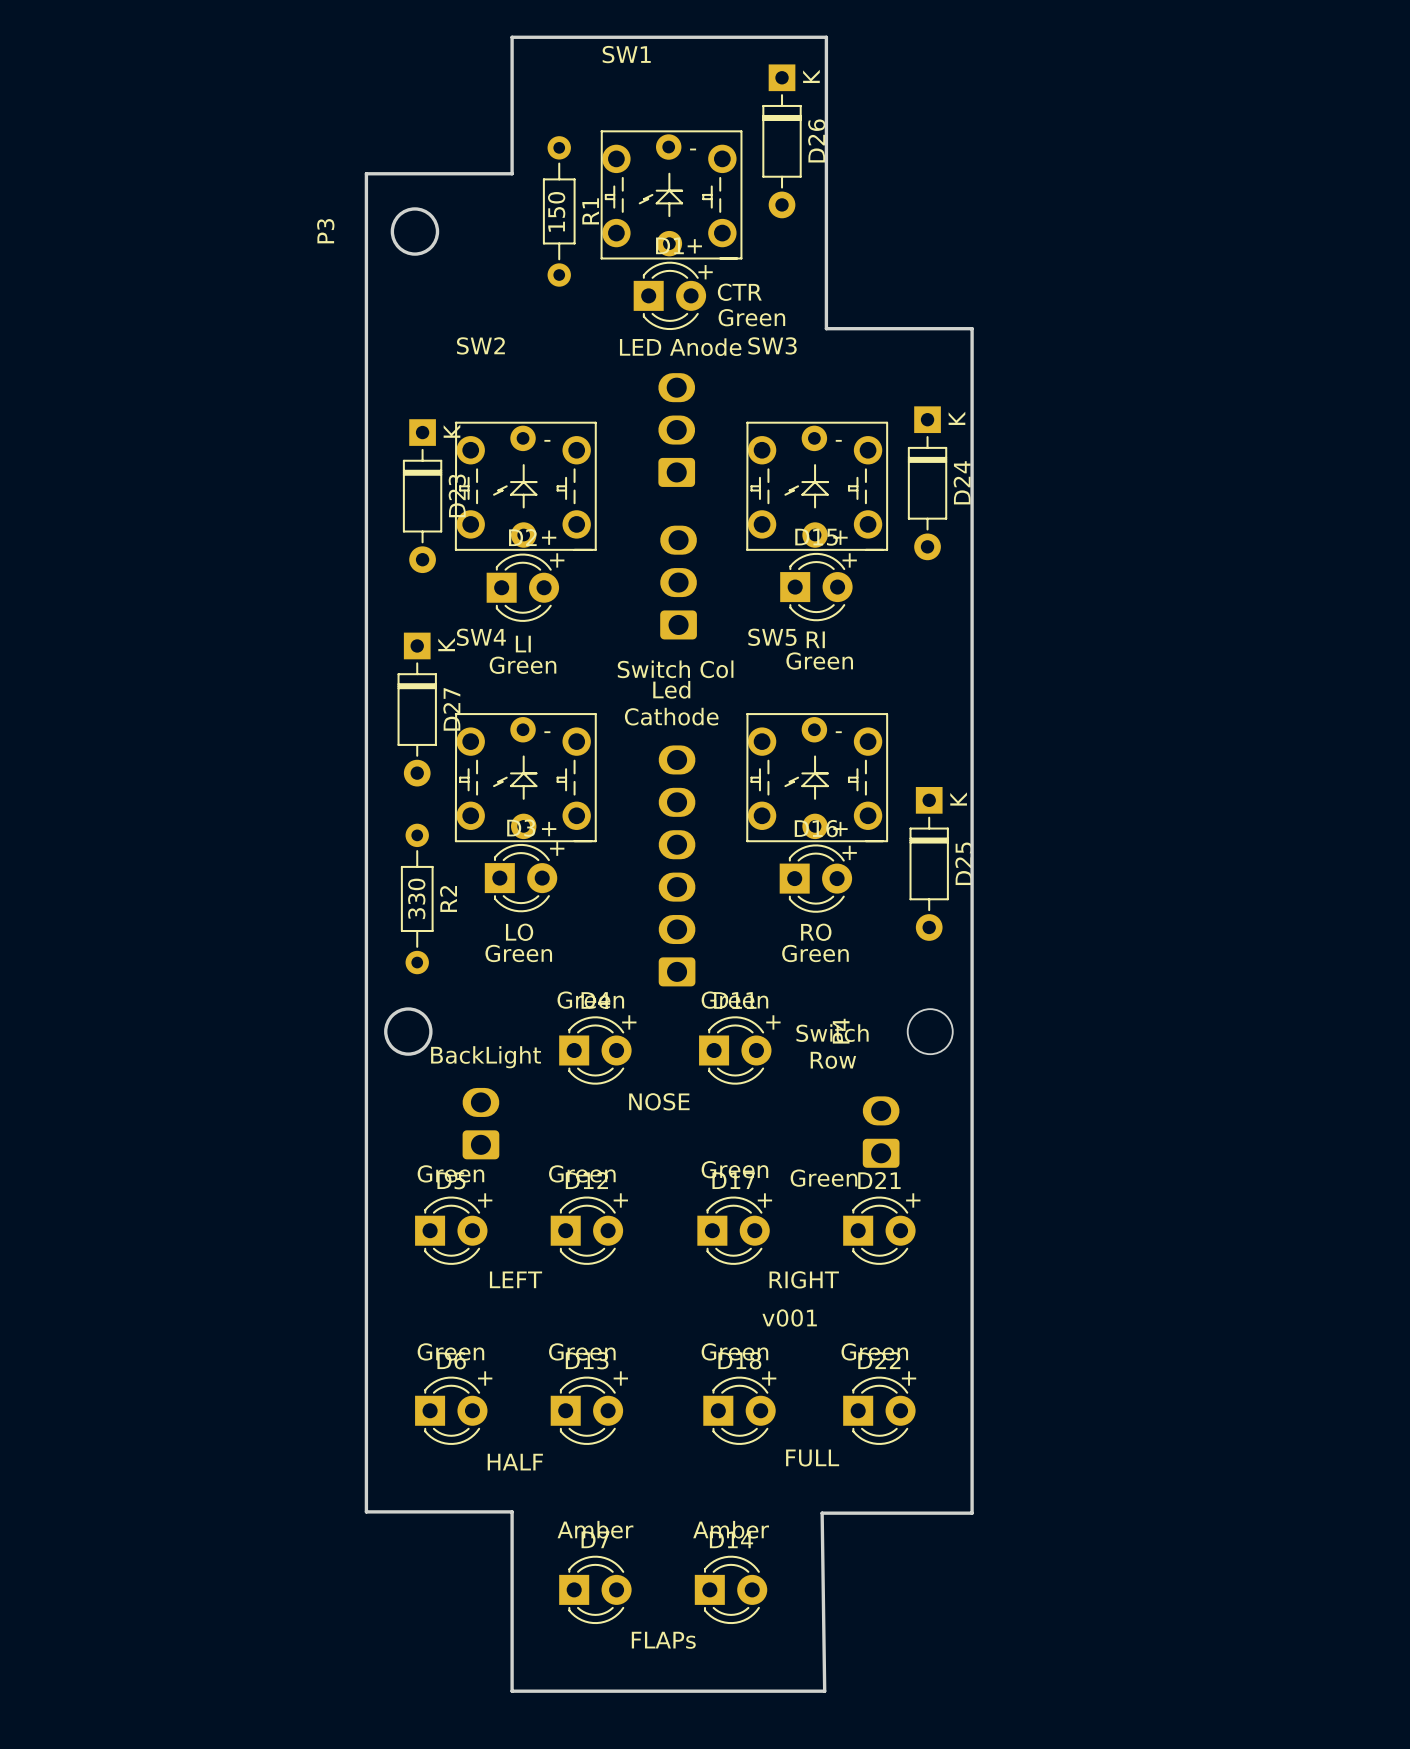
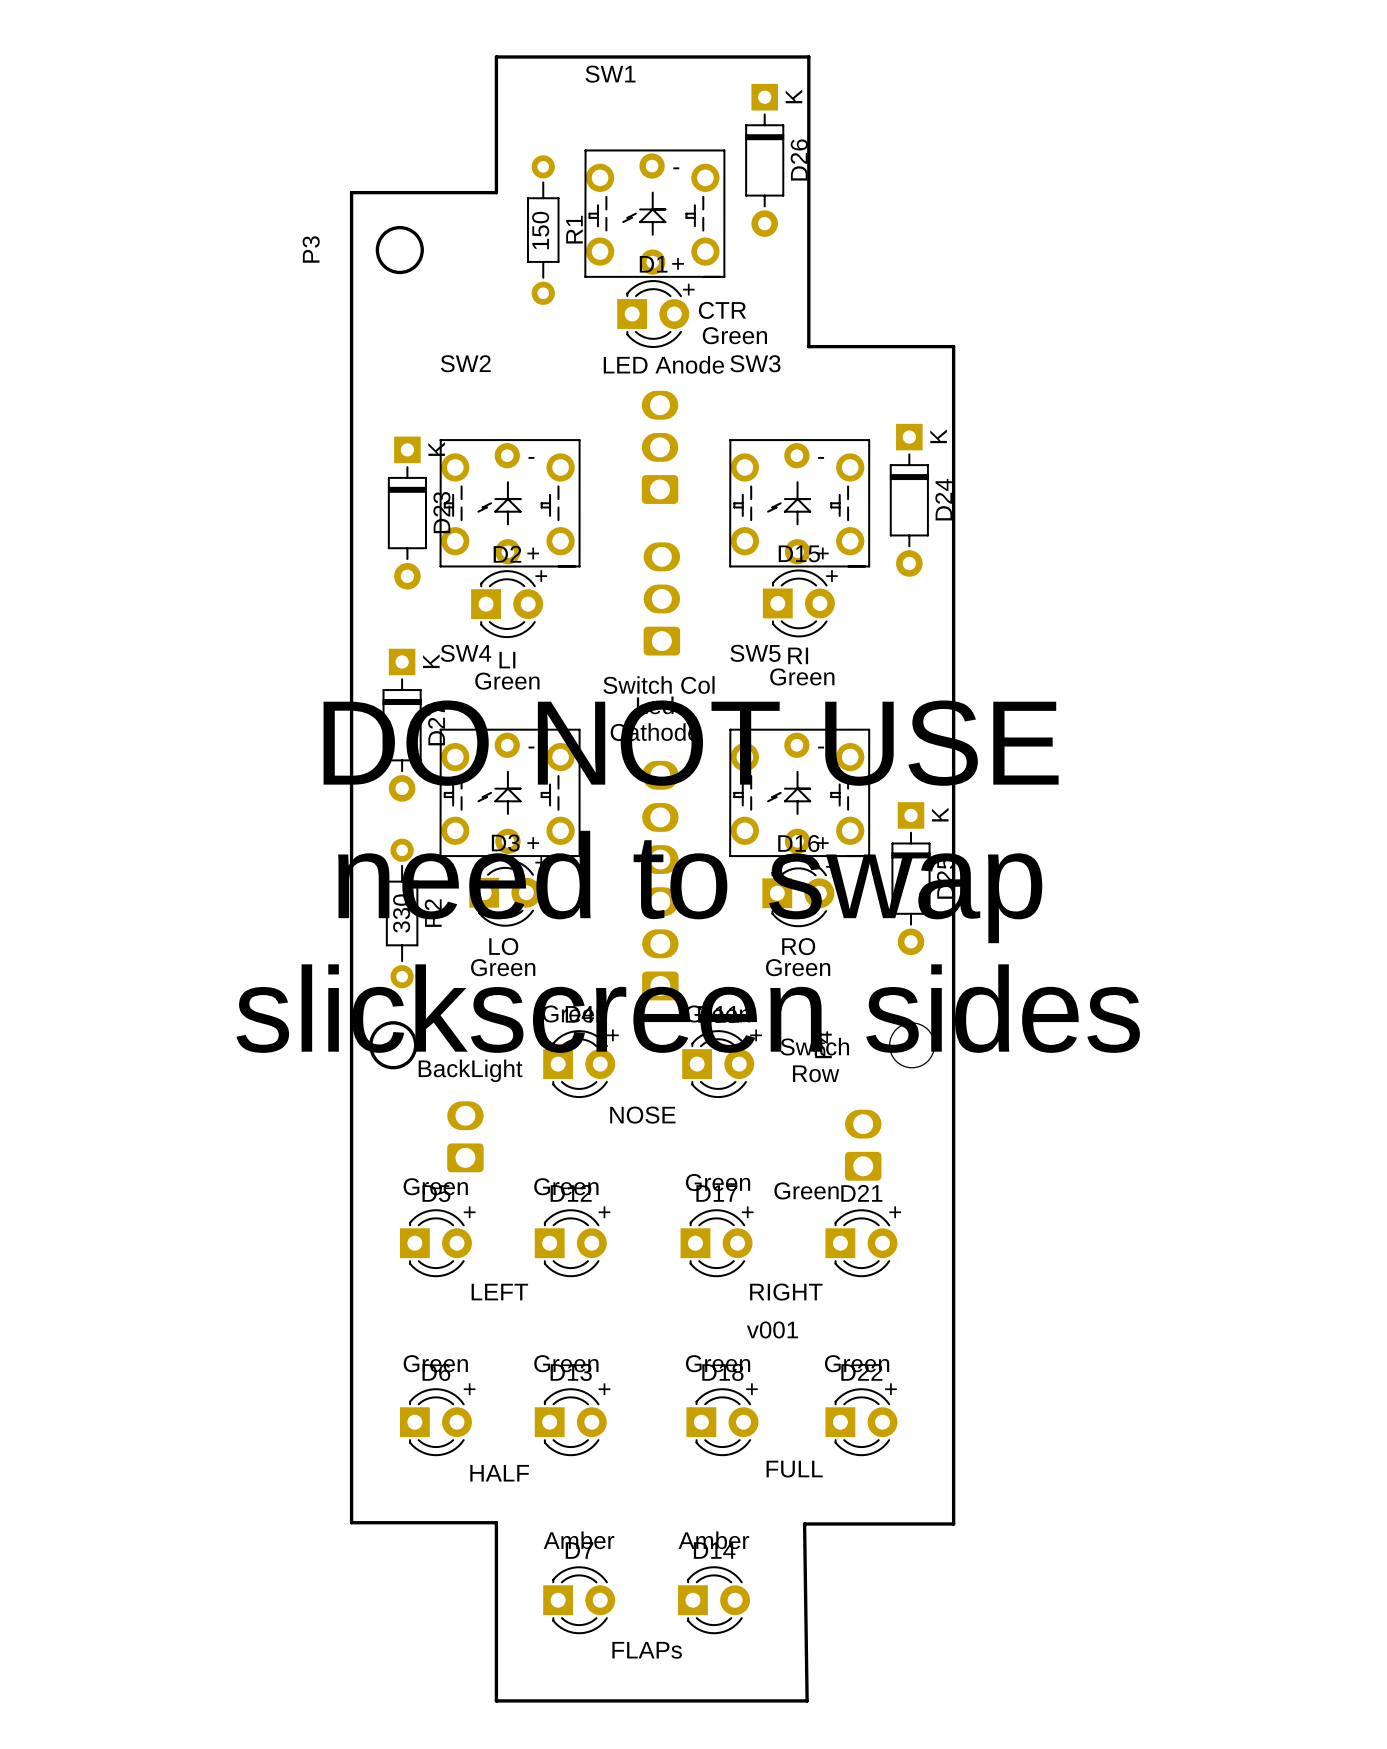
text: none -> DO NOT USE (691, 743)
text: none -> need to swap (690, 886)
text: none -> slickscreen sides (688, 1008)

